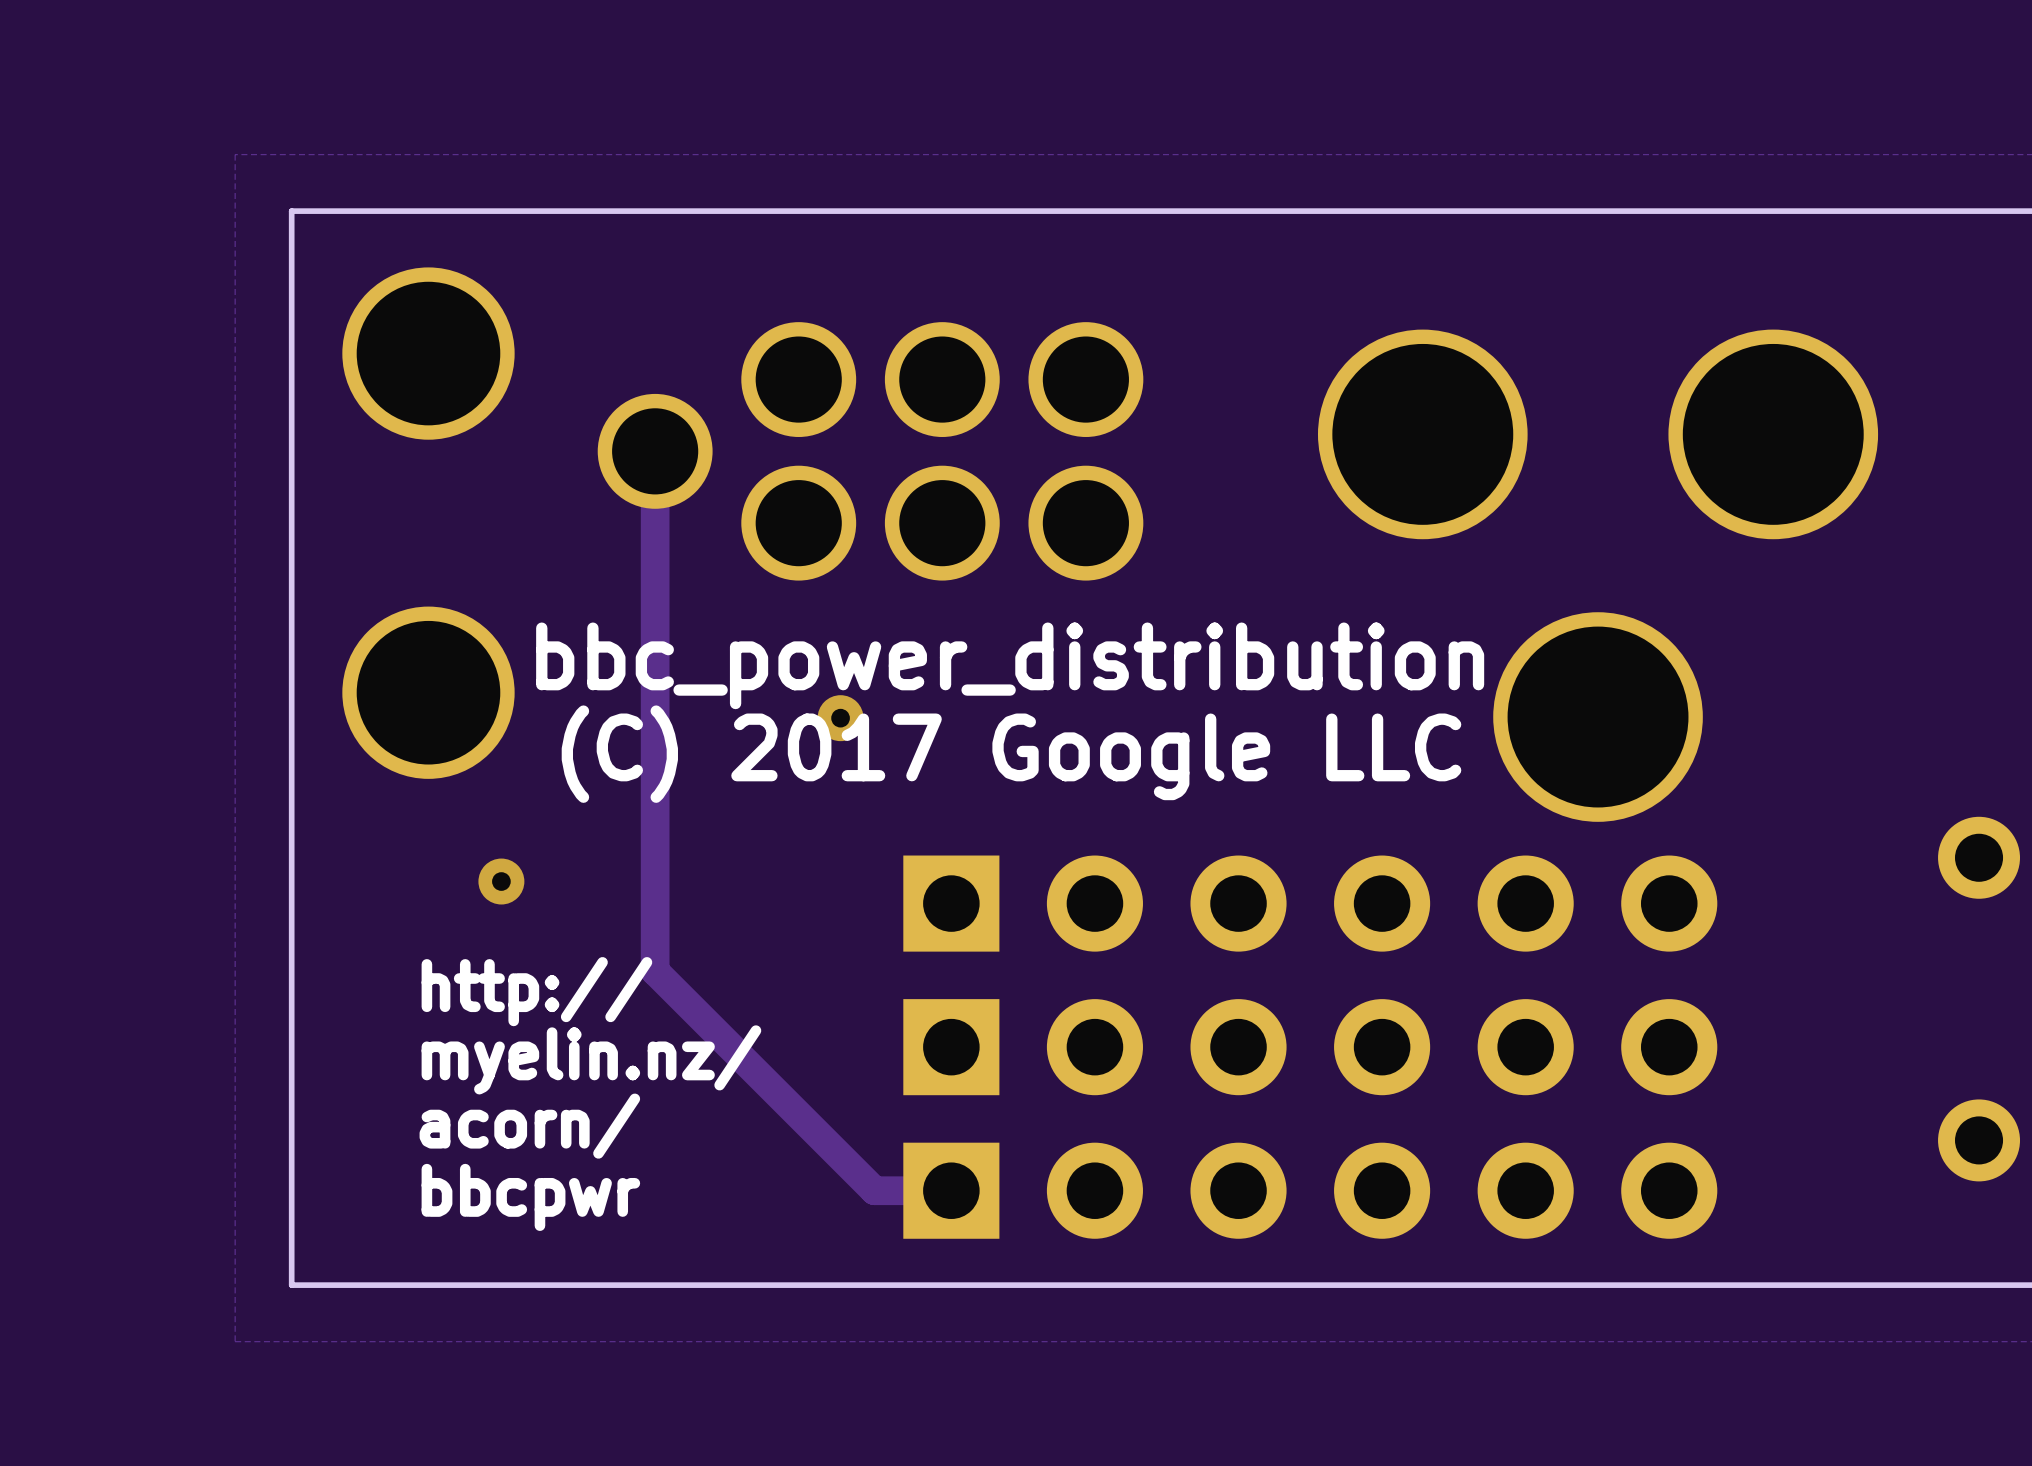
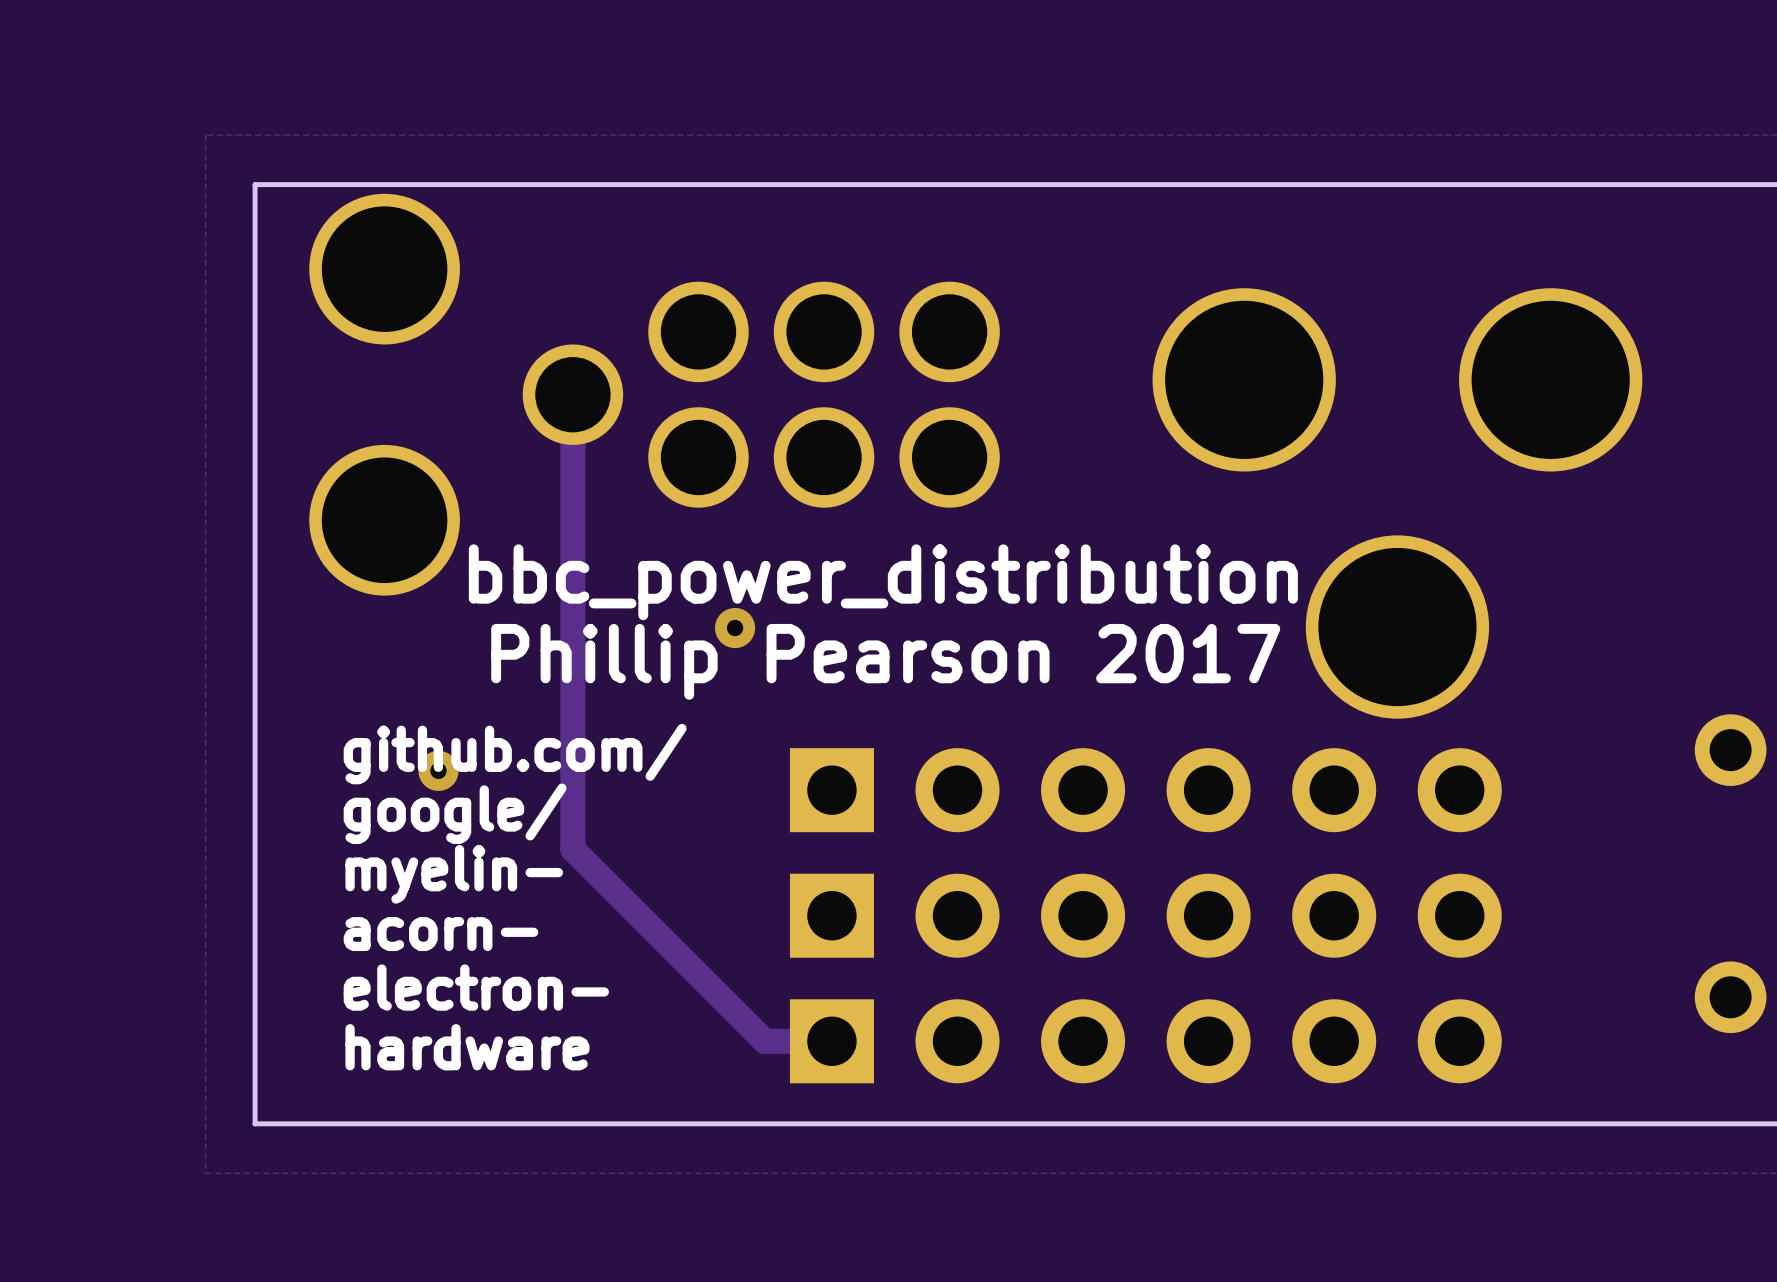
part position: (428, 353) -> (384, 269)
part position: (428, 692) -> (384, 520)
text: (C) 2017 Google LLC (1011, 754) -> Phillip Pearson 2017 (885, 661)
text: none -> github.com/ (515, 754)
text: none -> google/ (455, 813)
text: http:// (536, 991) -> myelin- (454, 874)
text: myelin.nz/ (591, 1059) -> acorn- (441, 934)
text: acorn/ (529, 1126) -> electron- (476, 987)
text: bbcpwr (530, 1197) -> hardware (467, 1047)

